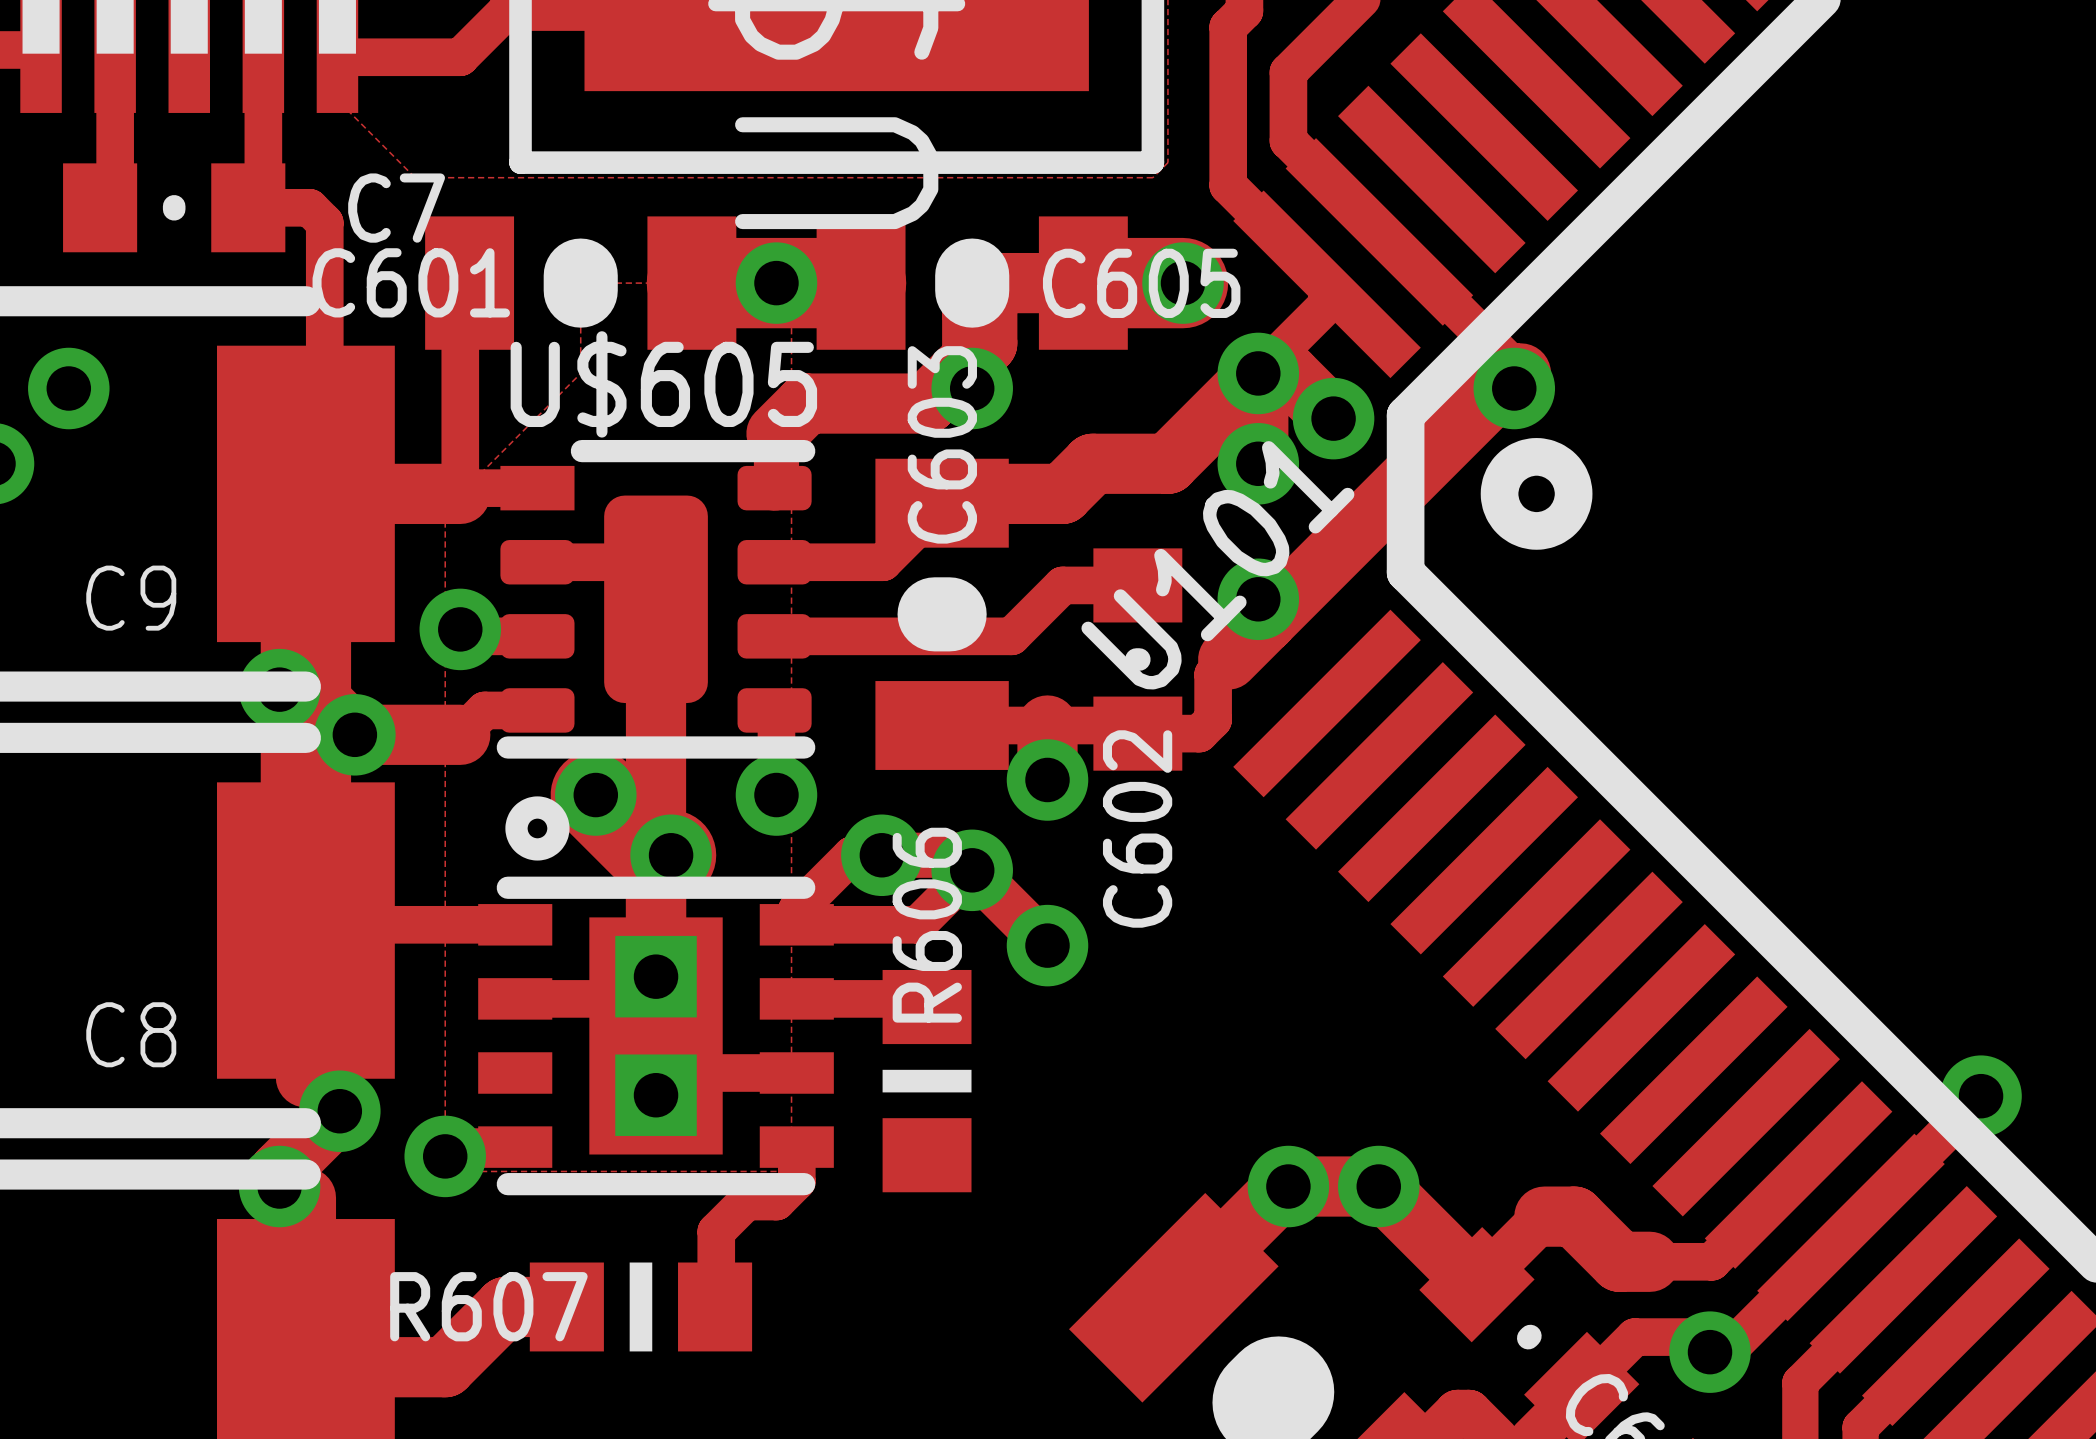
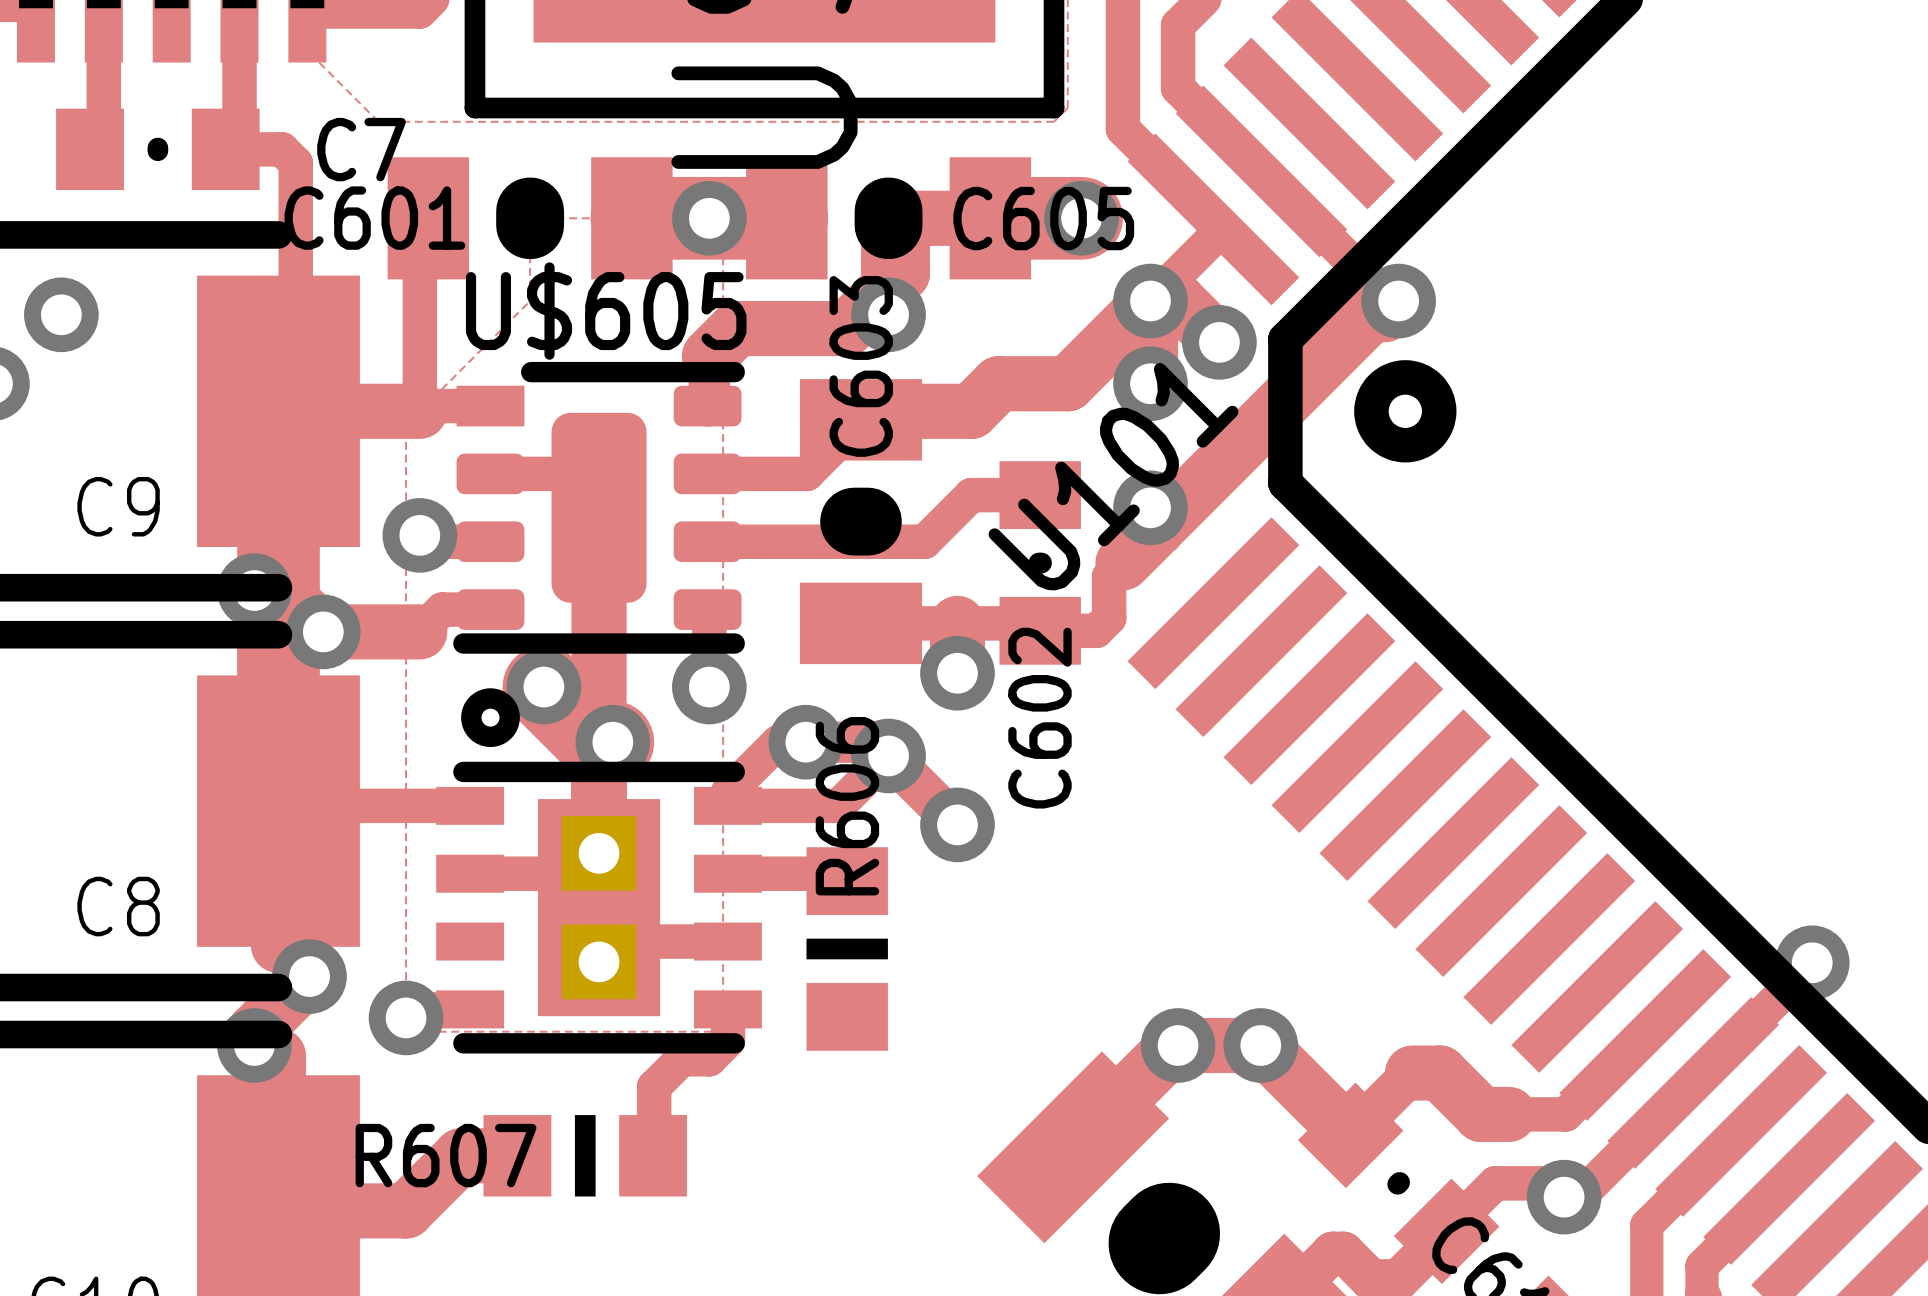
via position: (1514, 388) -> (1398, 301)

